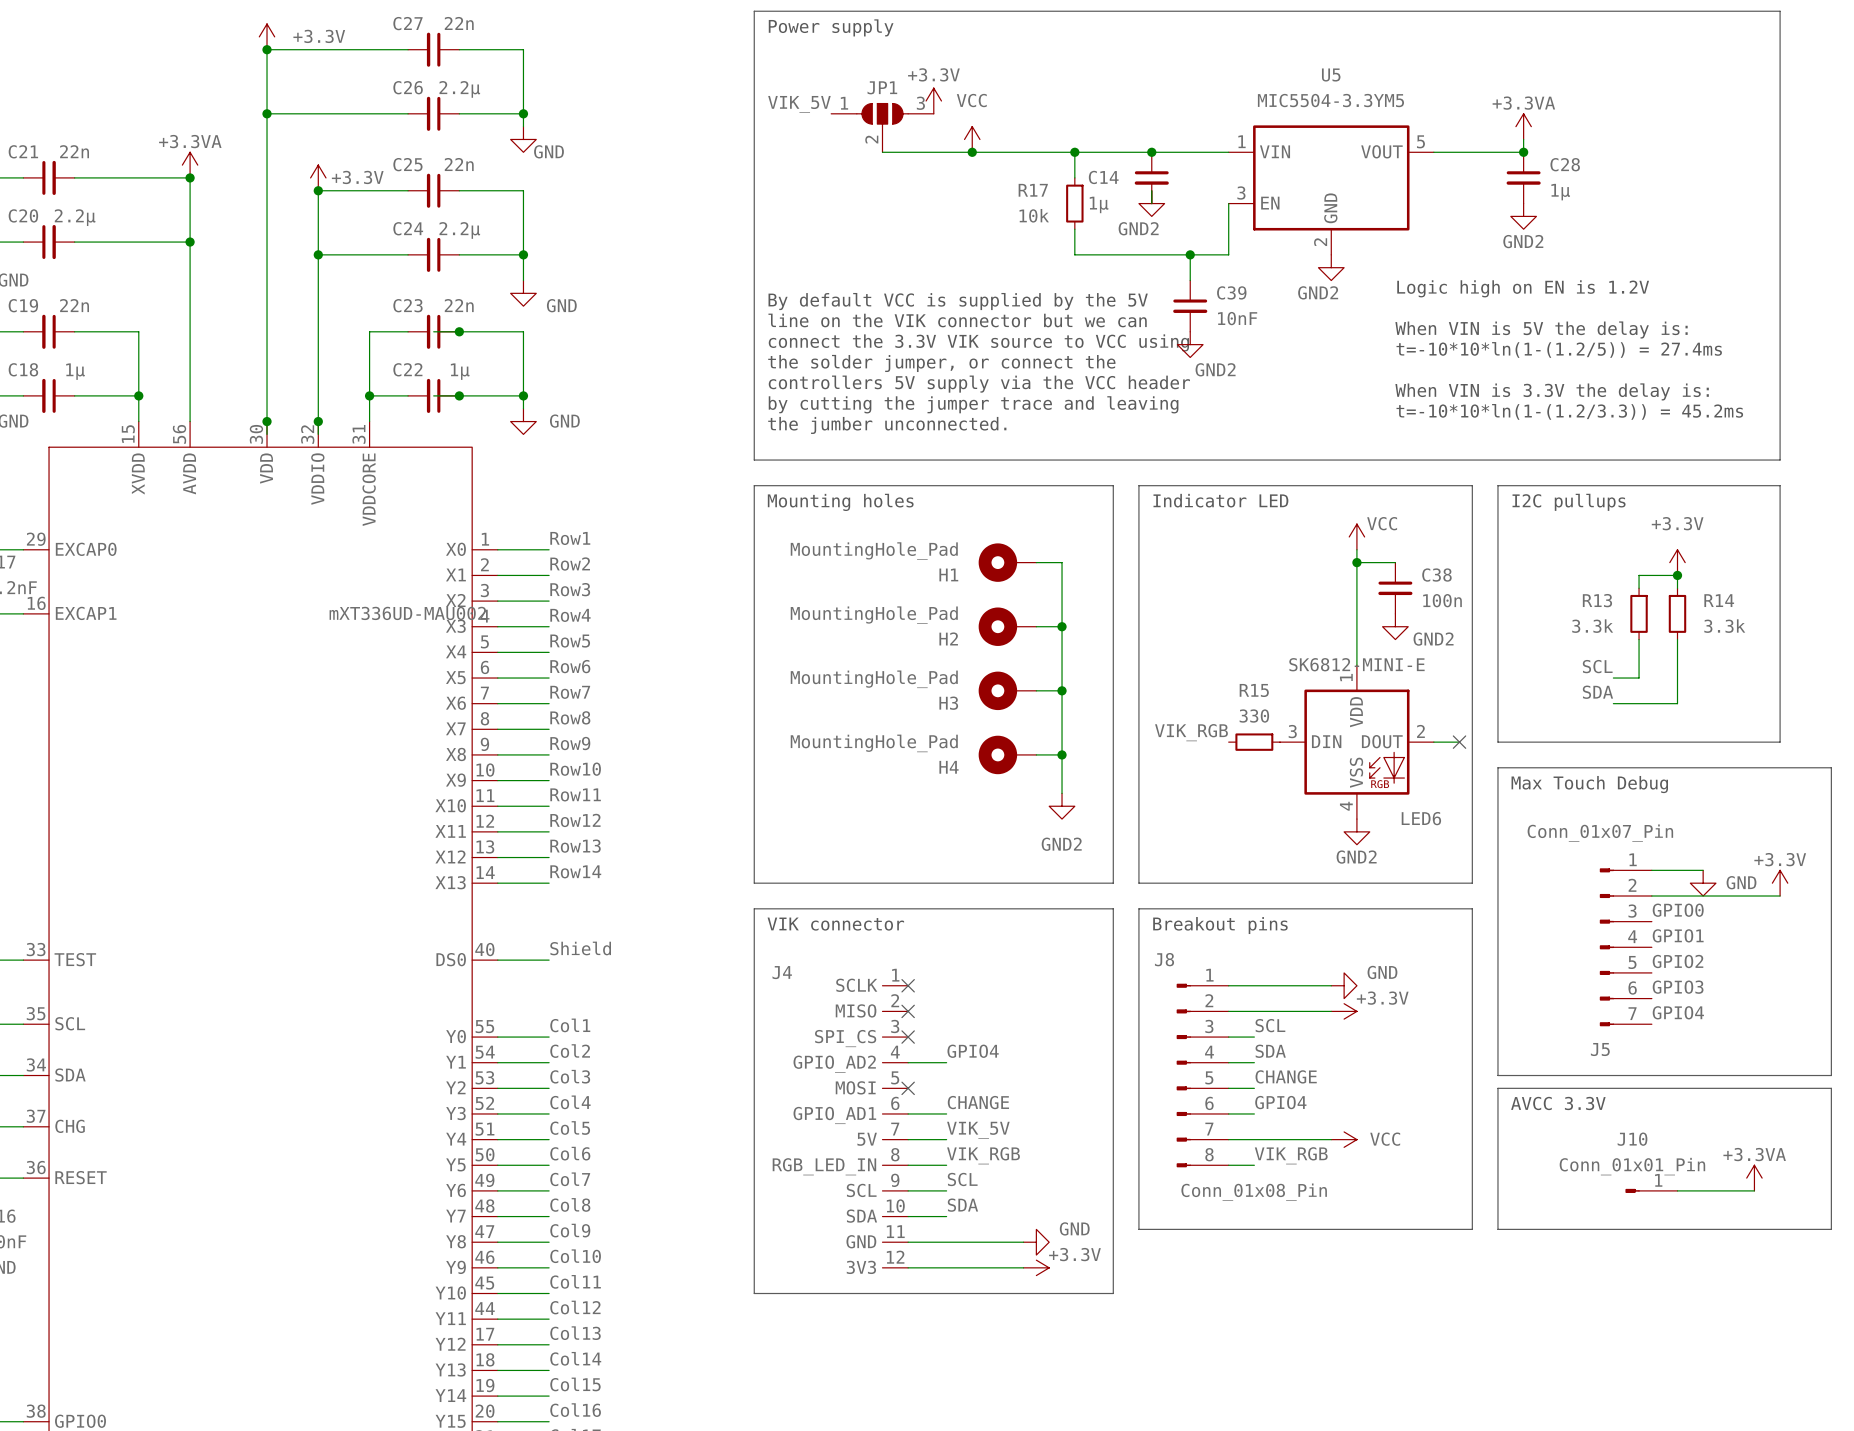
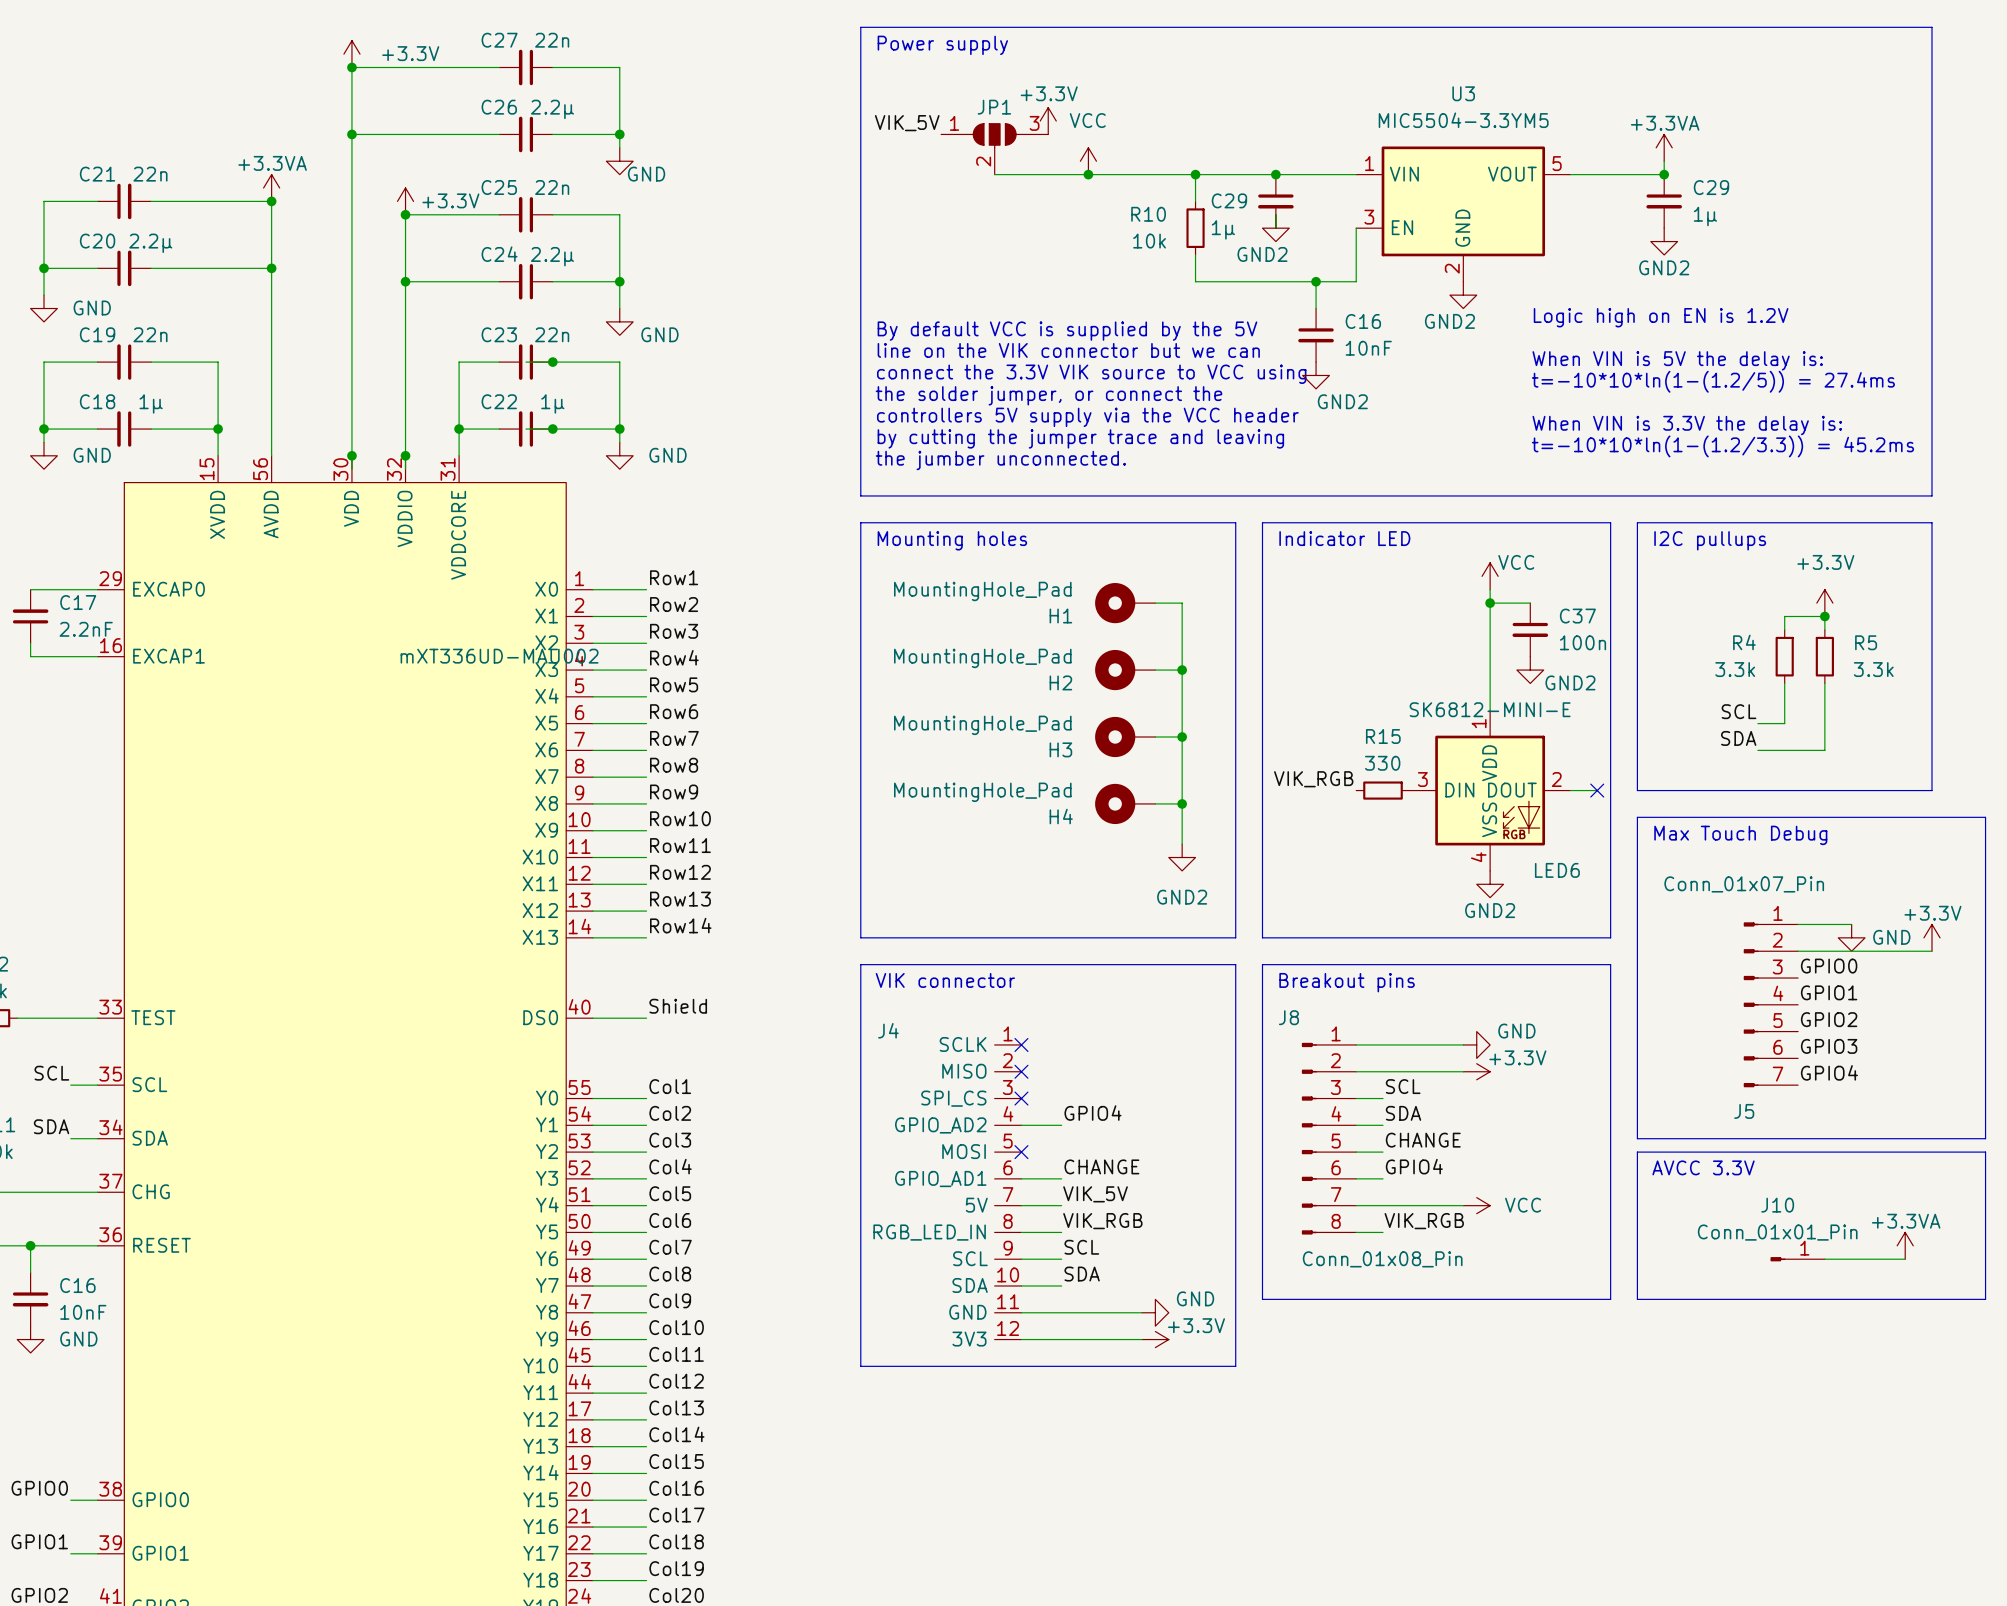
U5 name: U5 (1331, 74) -> U3 (1463, 93)
C28 name: C28 (1565, 164) -> C29 (1711, 187)
C14 name: C14 (1103, 177) -> C29 (1229, 200)
R17 name: R17 (1033, 190) -> R10 (1148, 214)
C39 name: C39 (1231, 292) -> C16 (1363, 321)
C38 name: C38 (1436, 575) -> C37 (1577, 616)
R13 name: R13 (1597, 600) -> R4 (1744, 642)
R14 name: R14 (1719, 600) -> R5 (1866, 642)

